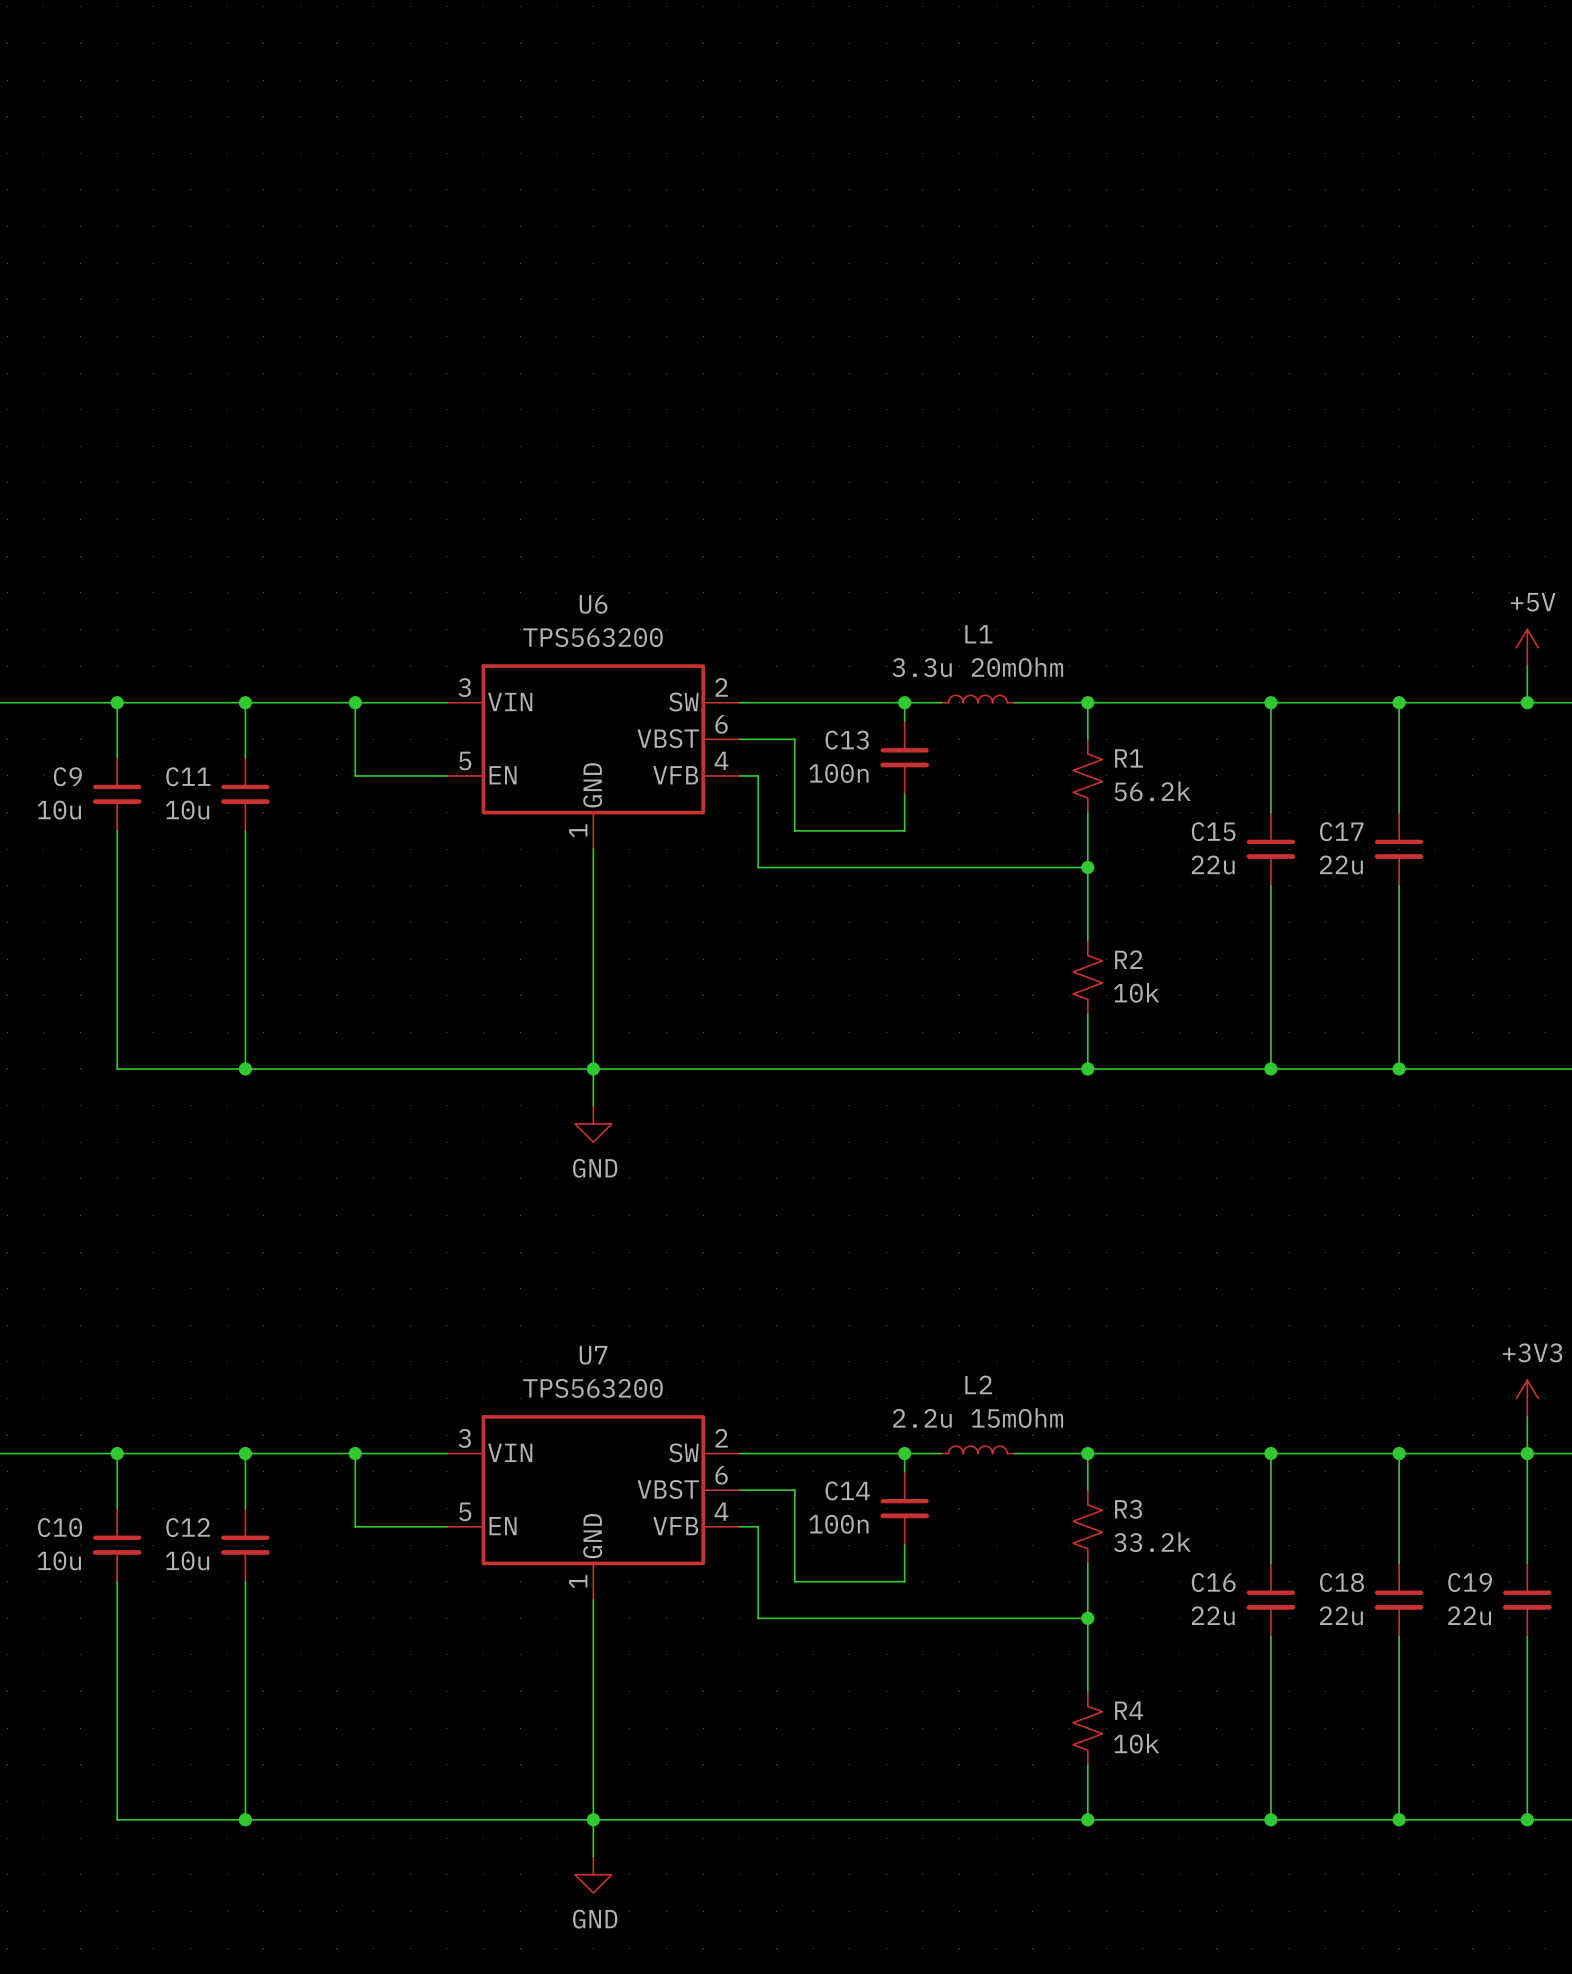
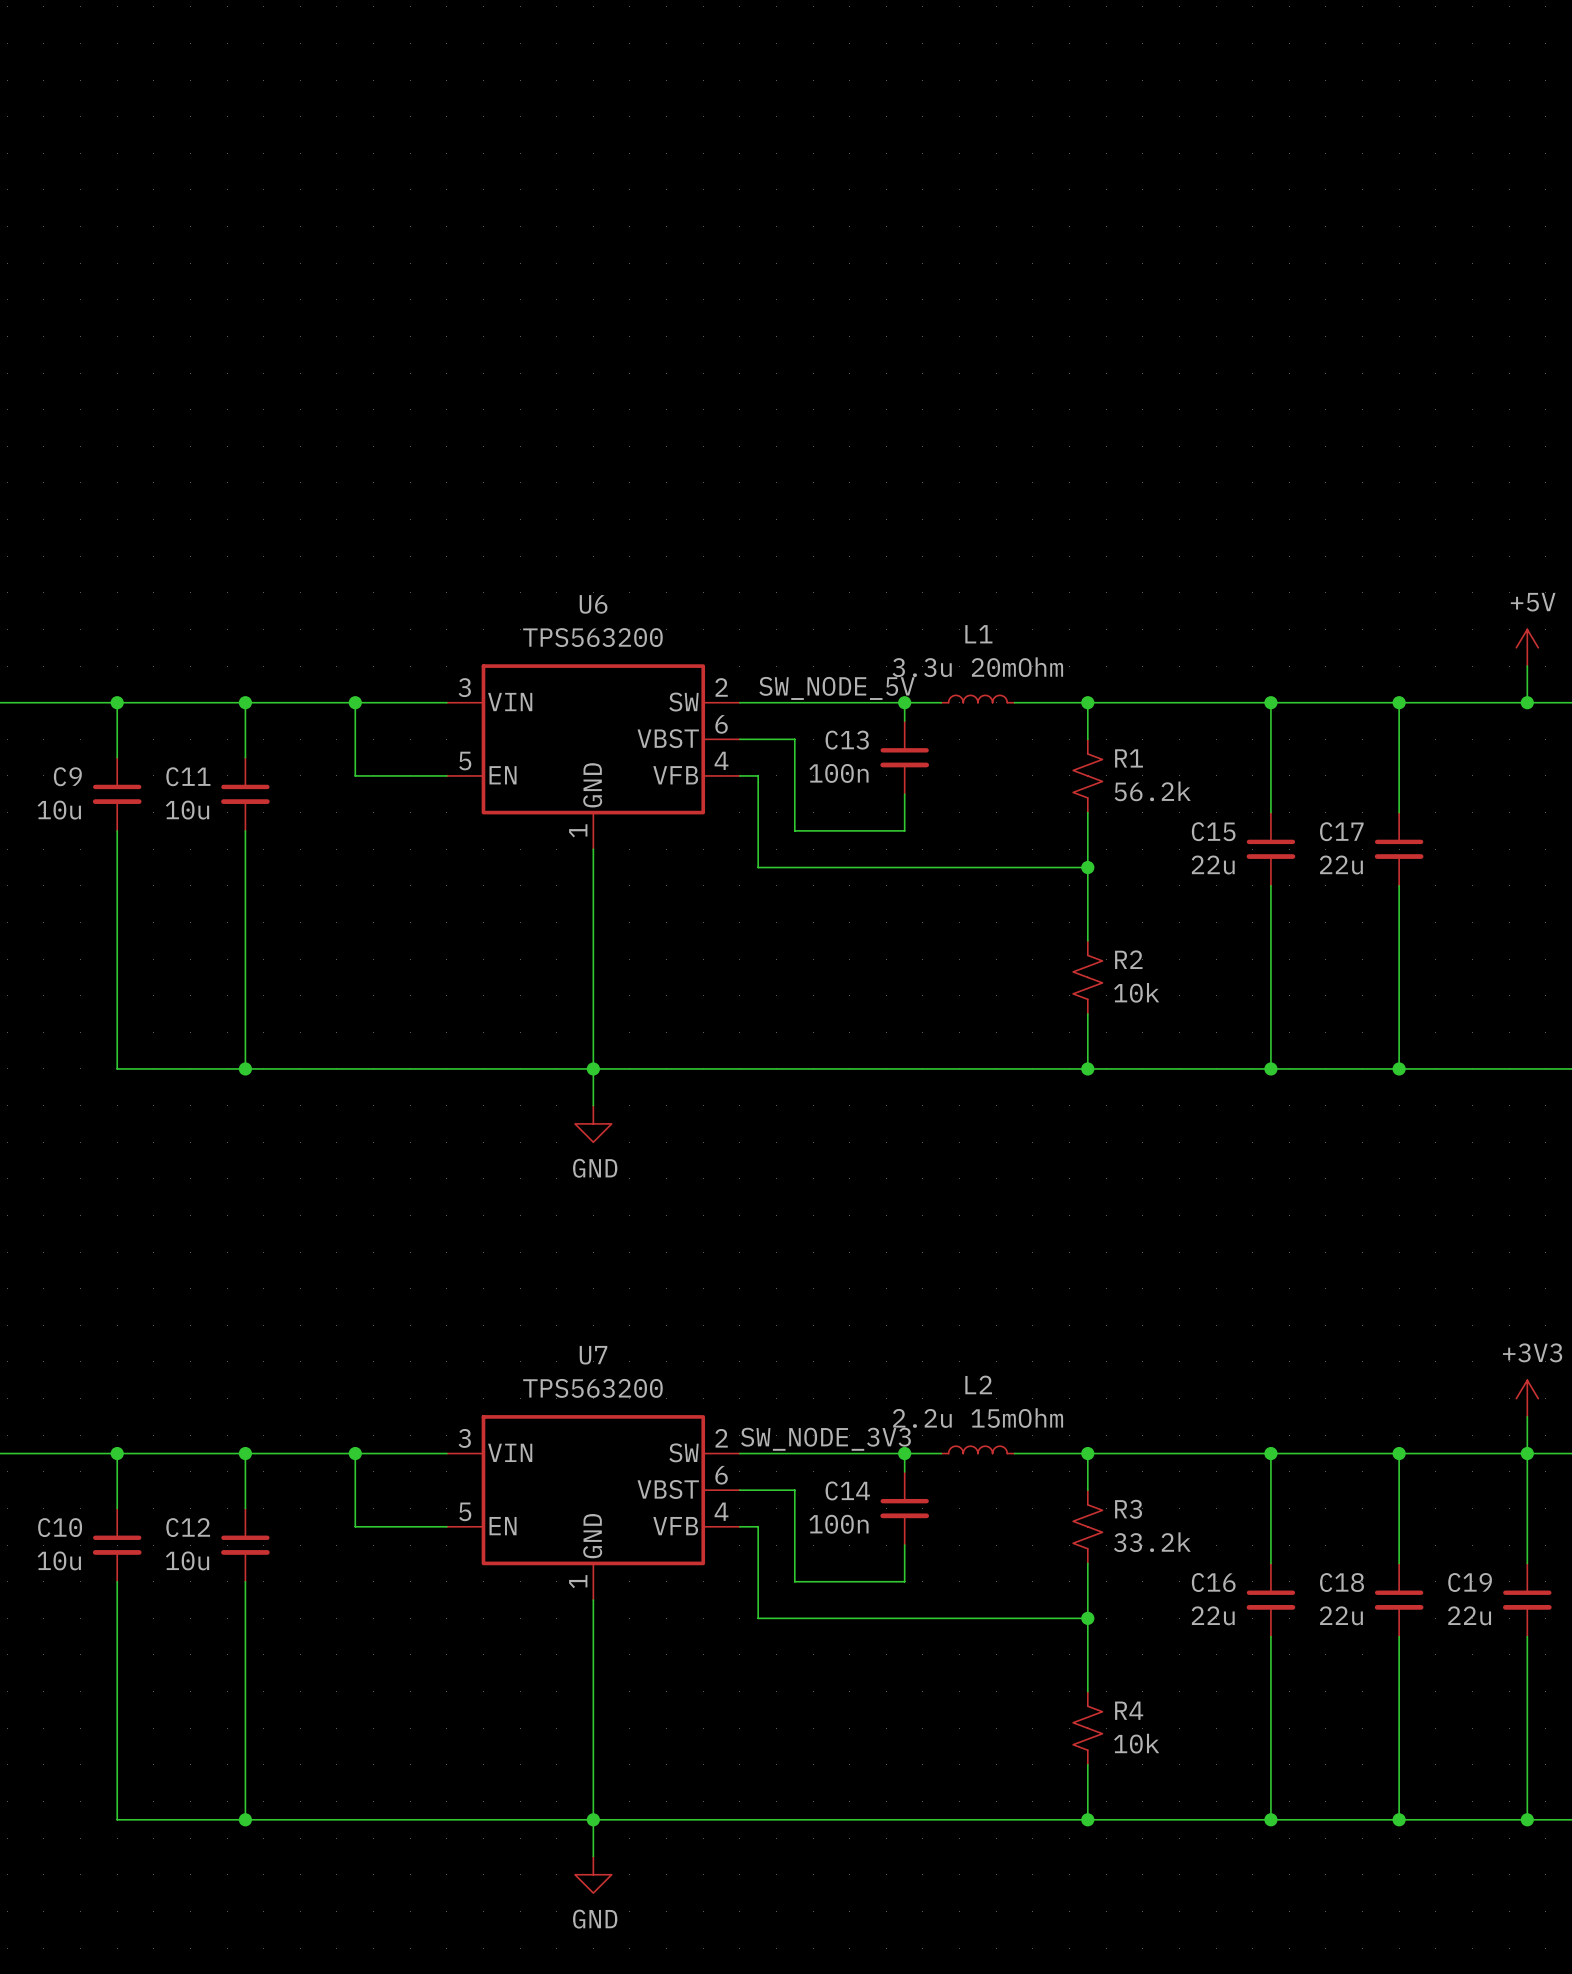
label: none -> SW_NODE_5V (837, 688)
label: none -> SW_NODE_3V3 (825, 1439)

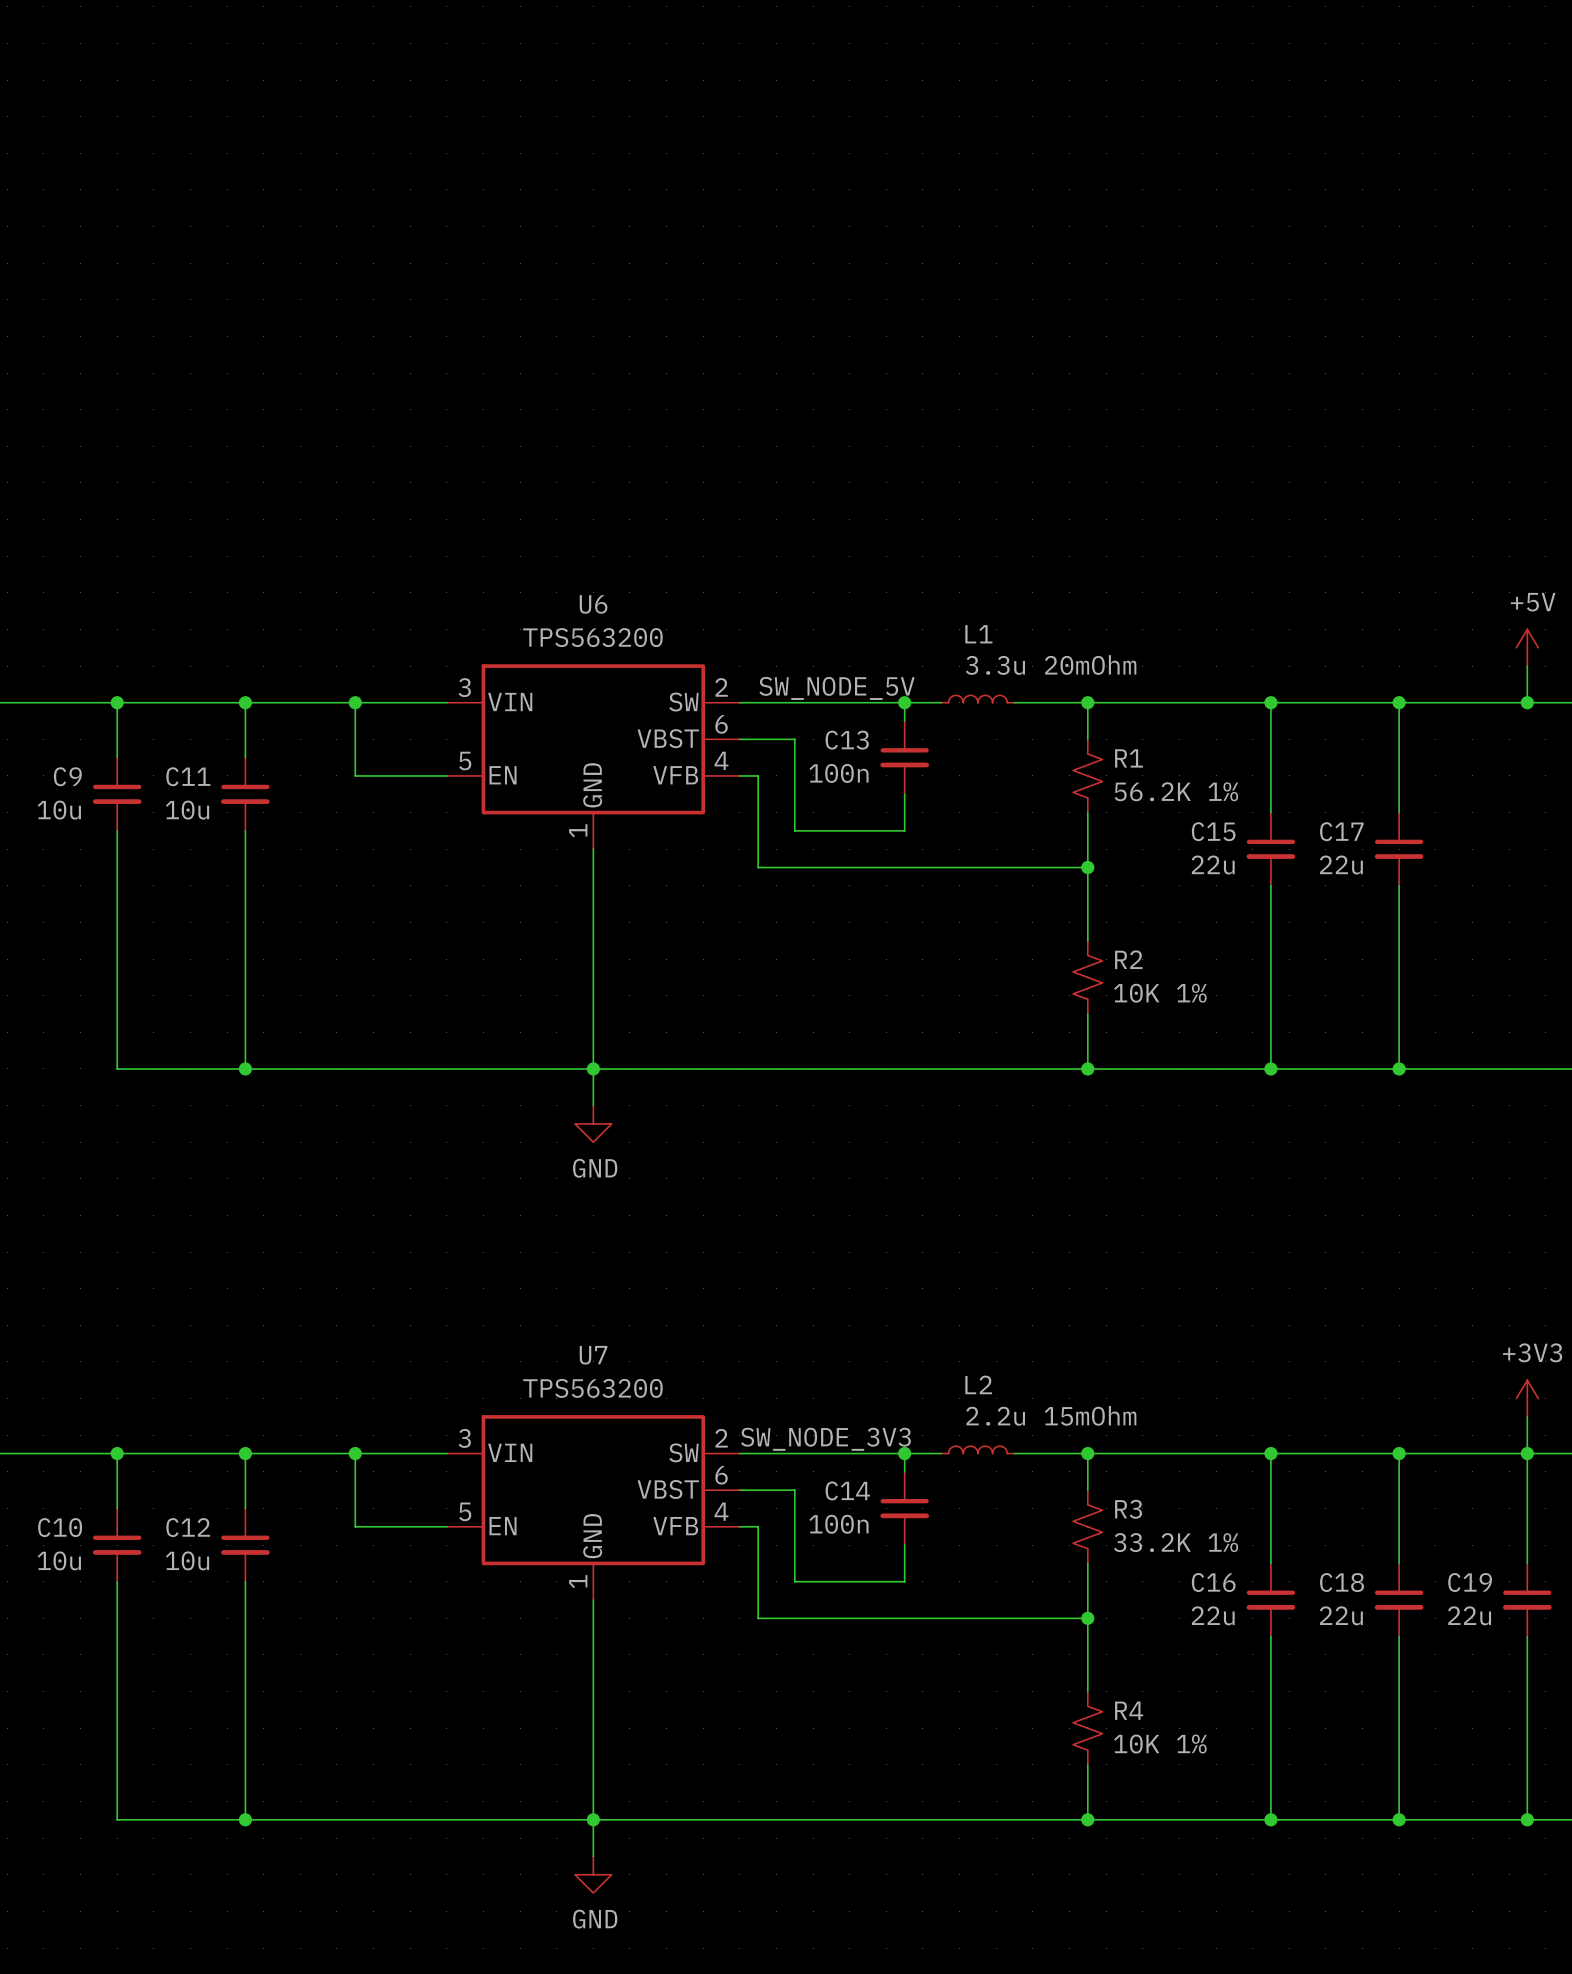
L1 value position: 3.3u 20mOhm (977, 667) -> 3.3u 20mOhm (1051, 665)
R1 value: 56.2k (1152, 791) -> 56.2K 1% (1176, 791)
R2 value: 10k (1136, 992) -> 10K 1% (1160, 993)
L2 value position: 2.2u 15mOhm (978, 1418) -> 2.2u 15mOhm (1051, 1415)
R3 value: 33.2k (1152, 1542) -> 33.2K 1% (1176, 1542)
R4 value: 10k (1136, 1743) -> 10K 1% (1160, 1744)

